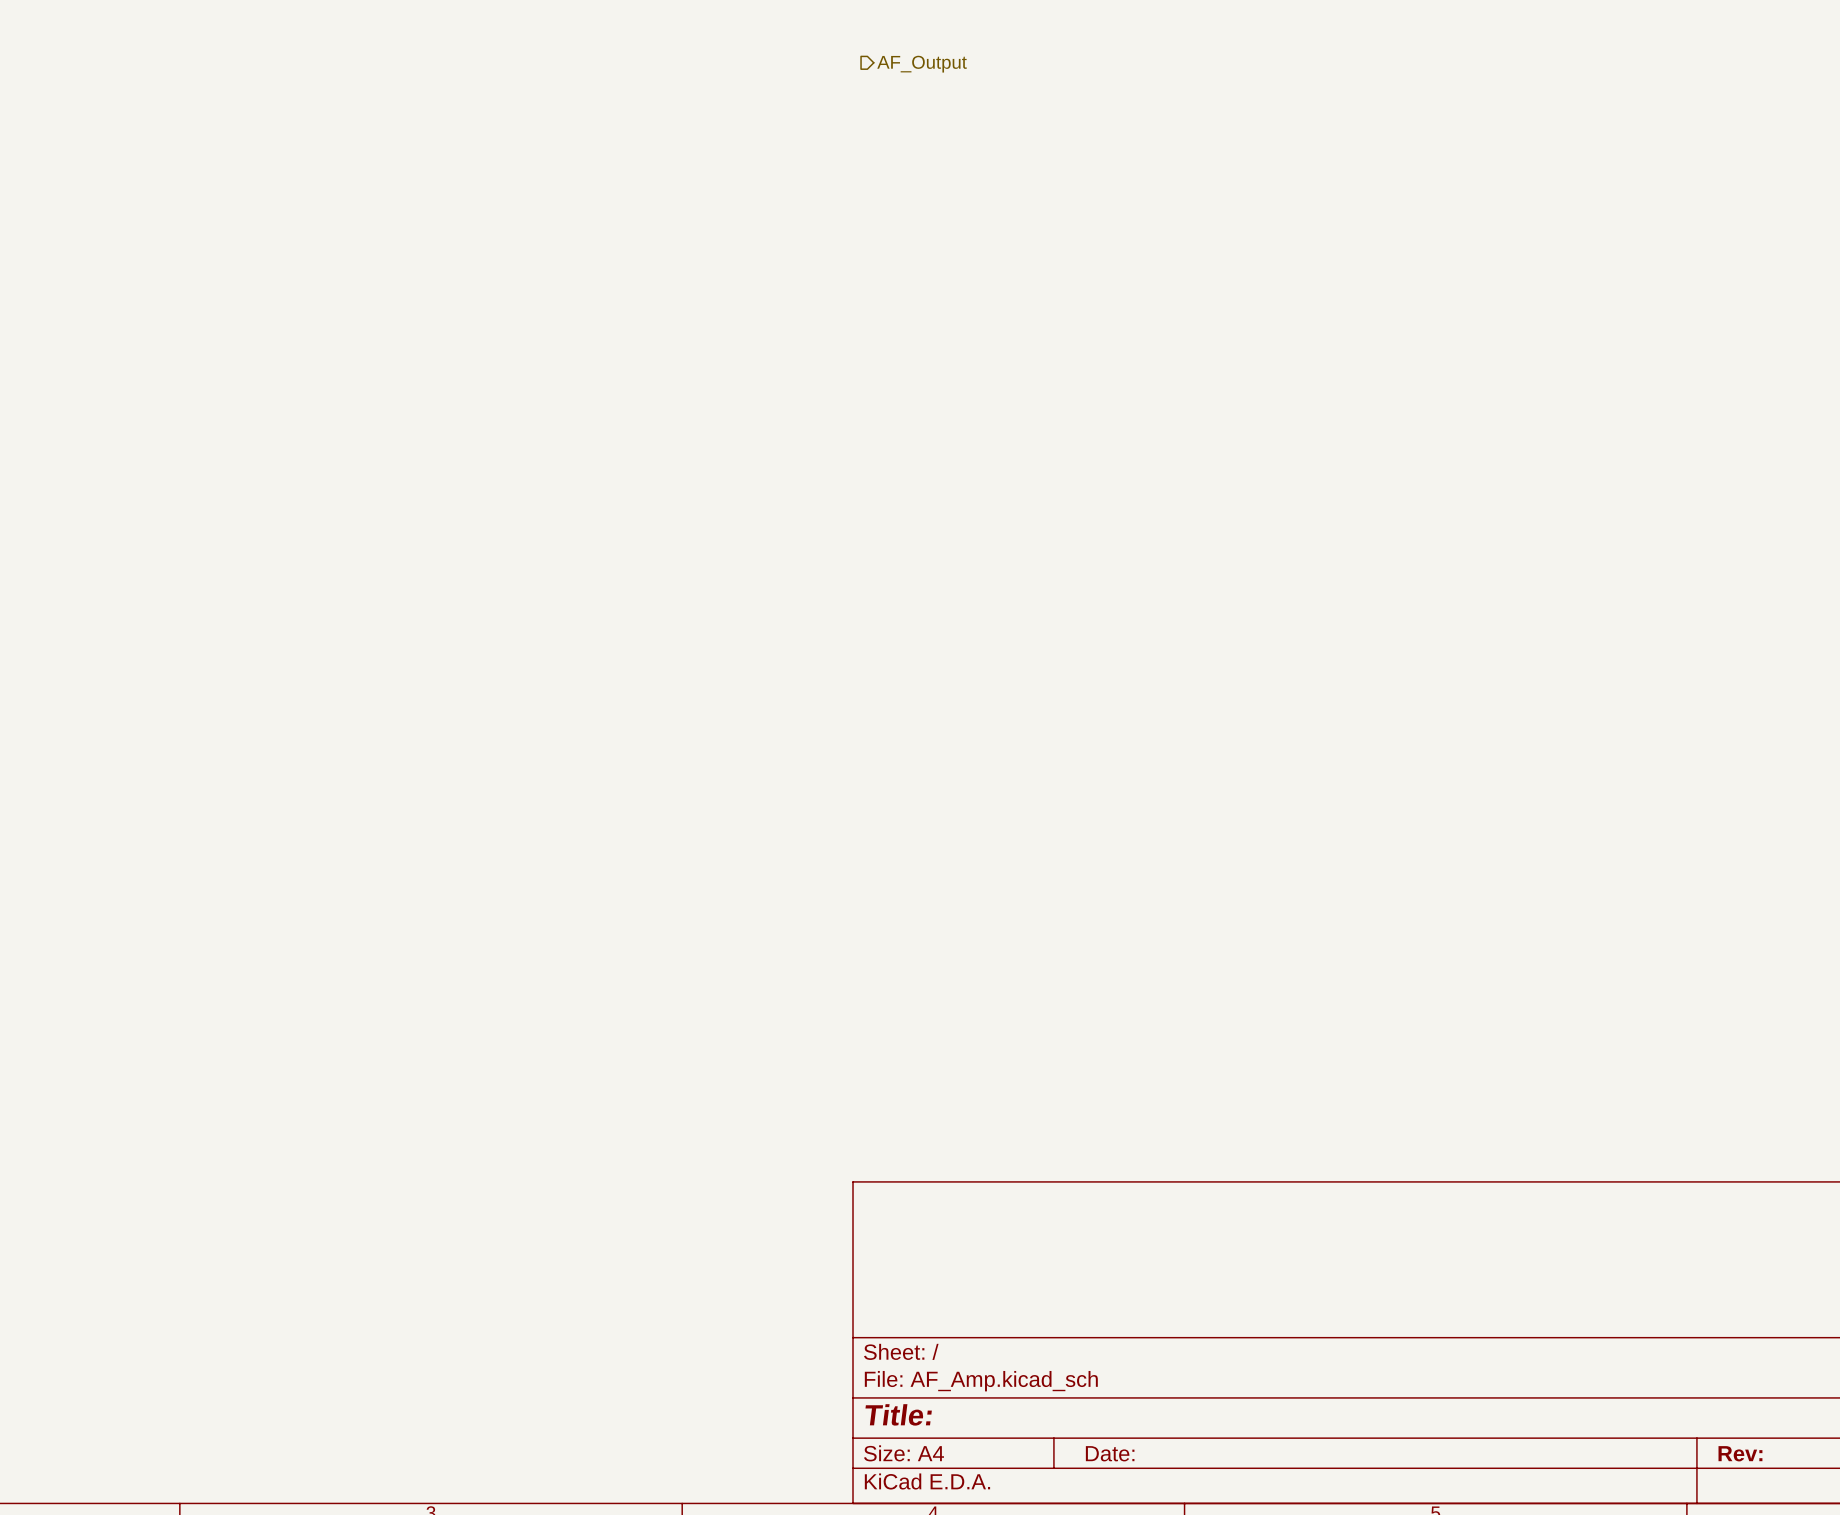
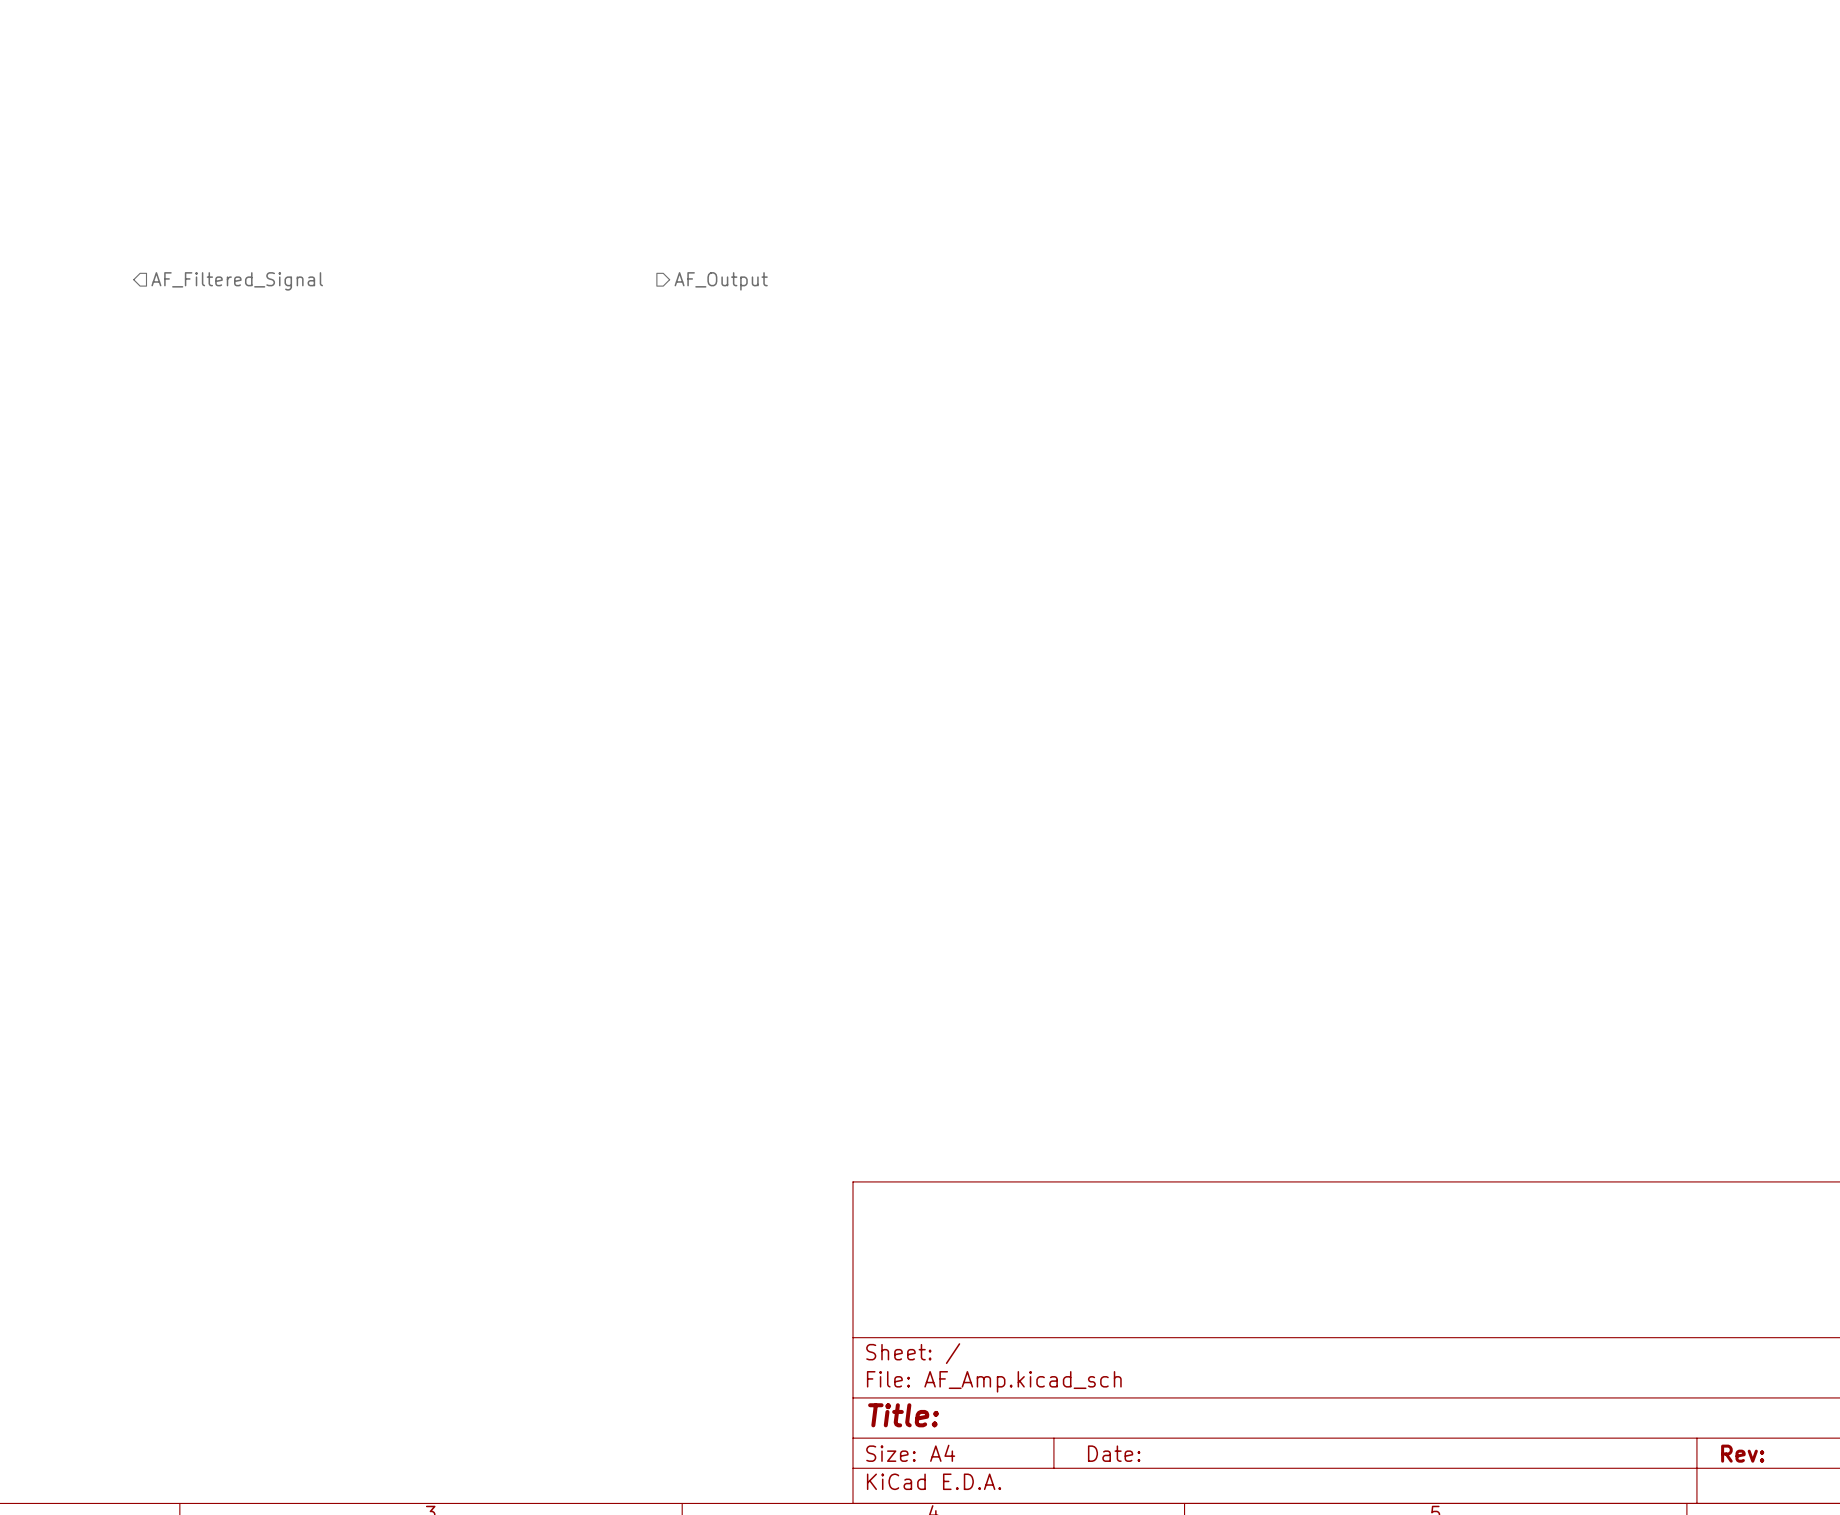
hierarchical label: AF_Output (922, 64) -> none
hierarchical label: none -> AF_Filtered_Signal (237, 281)
hierarchical label: none -> AF_Output (721, 281)

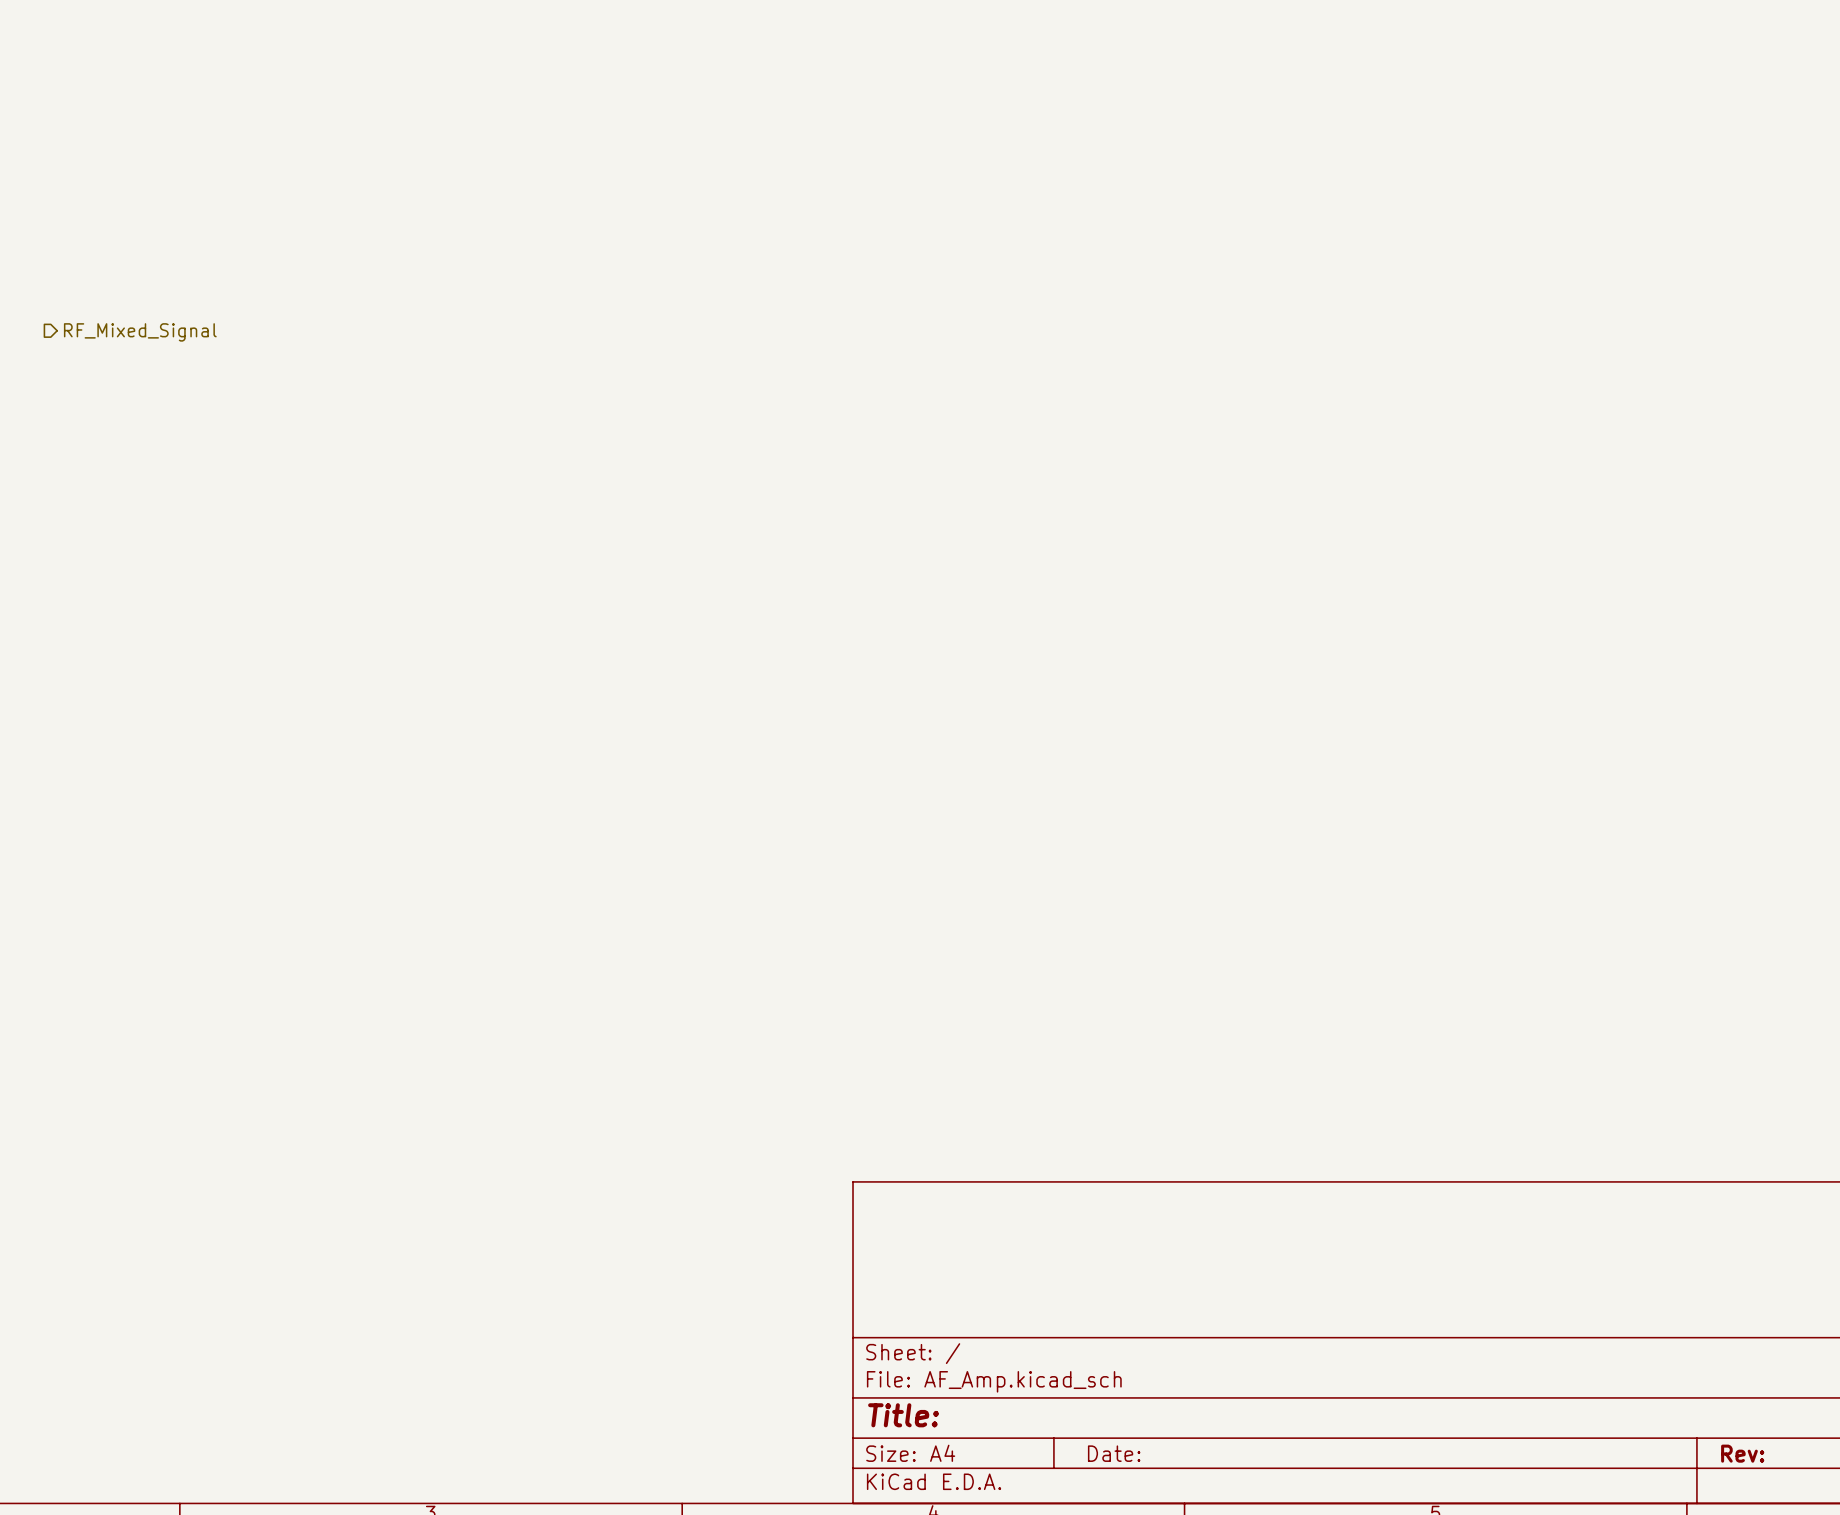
hierarchical label: AF_Filtered_Signal (237, 281) -> none
hierarchical label: AF_Output (721, 281) -> none
hierarchical label: none -> RF_Mixed_Signal (140, 332)

